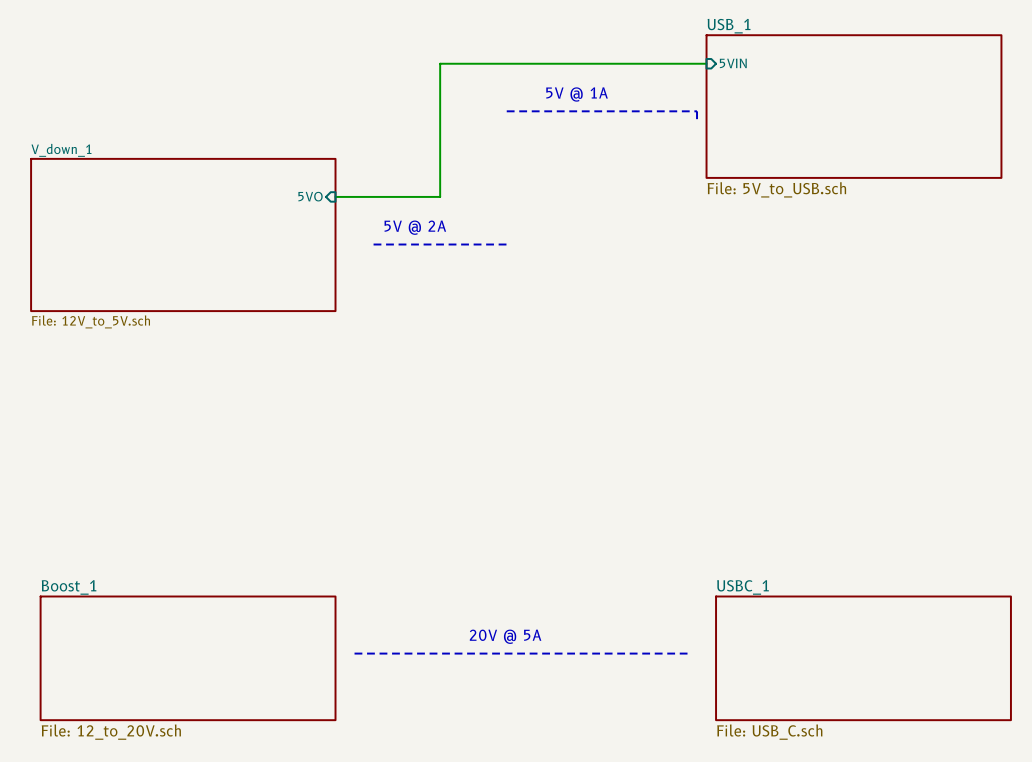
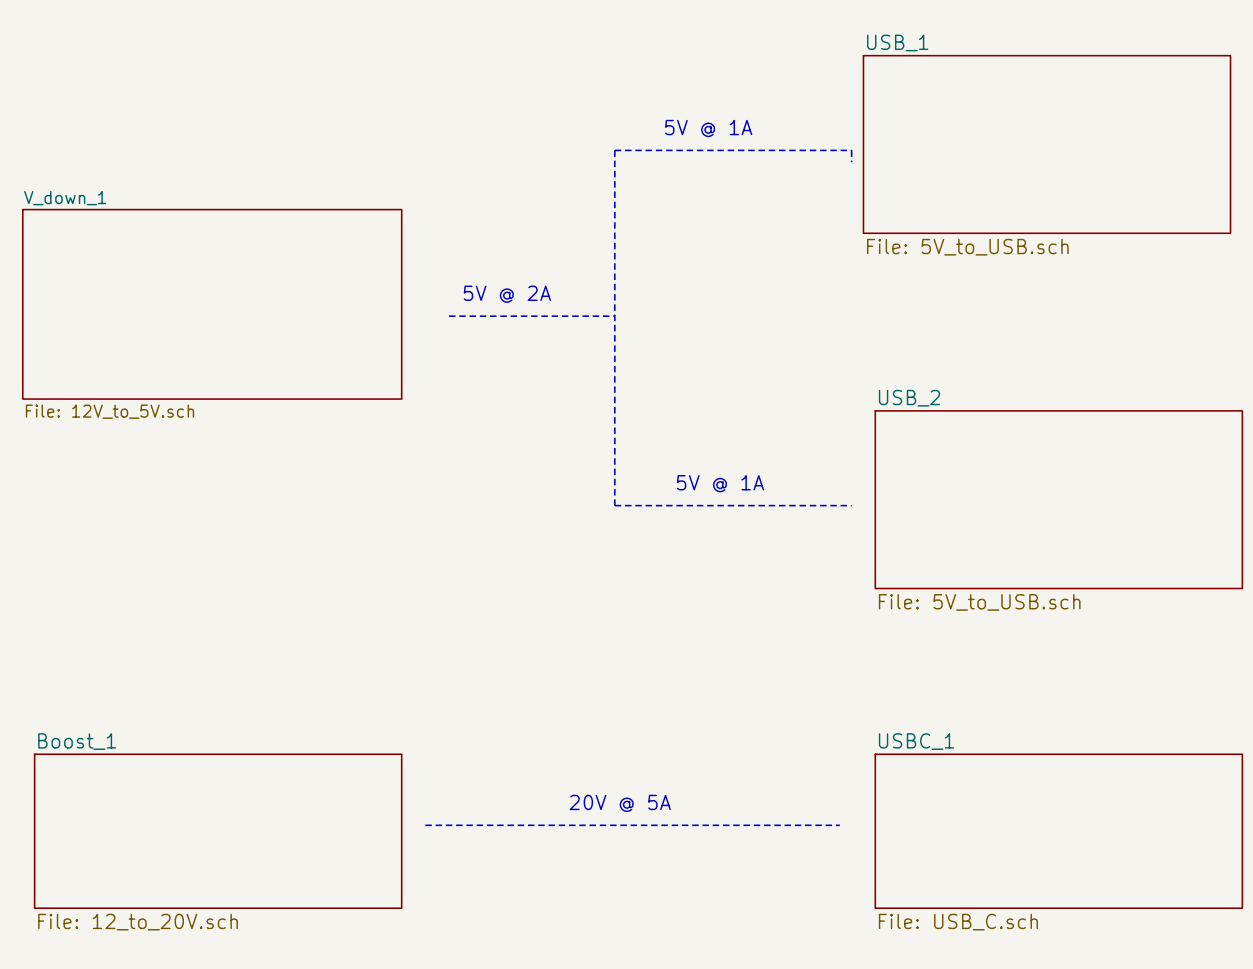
wire: (706, 63) (440, 63) (440, 196) (335, 196) -> none
sheet pin: 5VIN (733, 63) -> none
line: none -> (614, 150) (614, 505) (851, 505)
sheet pin: 5VO (310, 196) -> none
text: none -> 5V @ 1A (720, 483)
sheet USB_2: none -> File: 5V_to_USB.sch (1058, 499)

